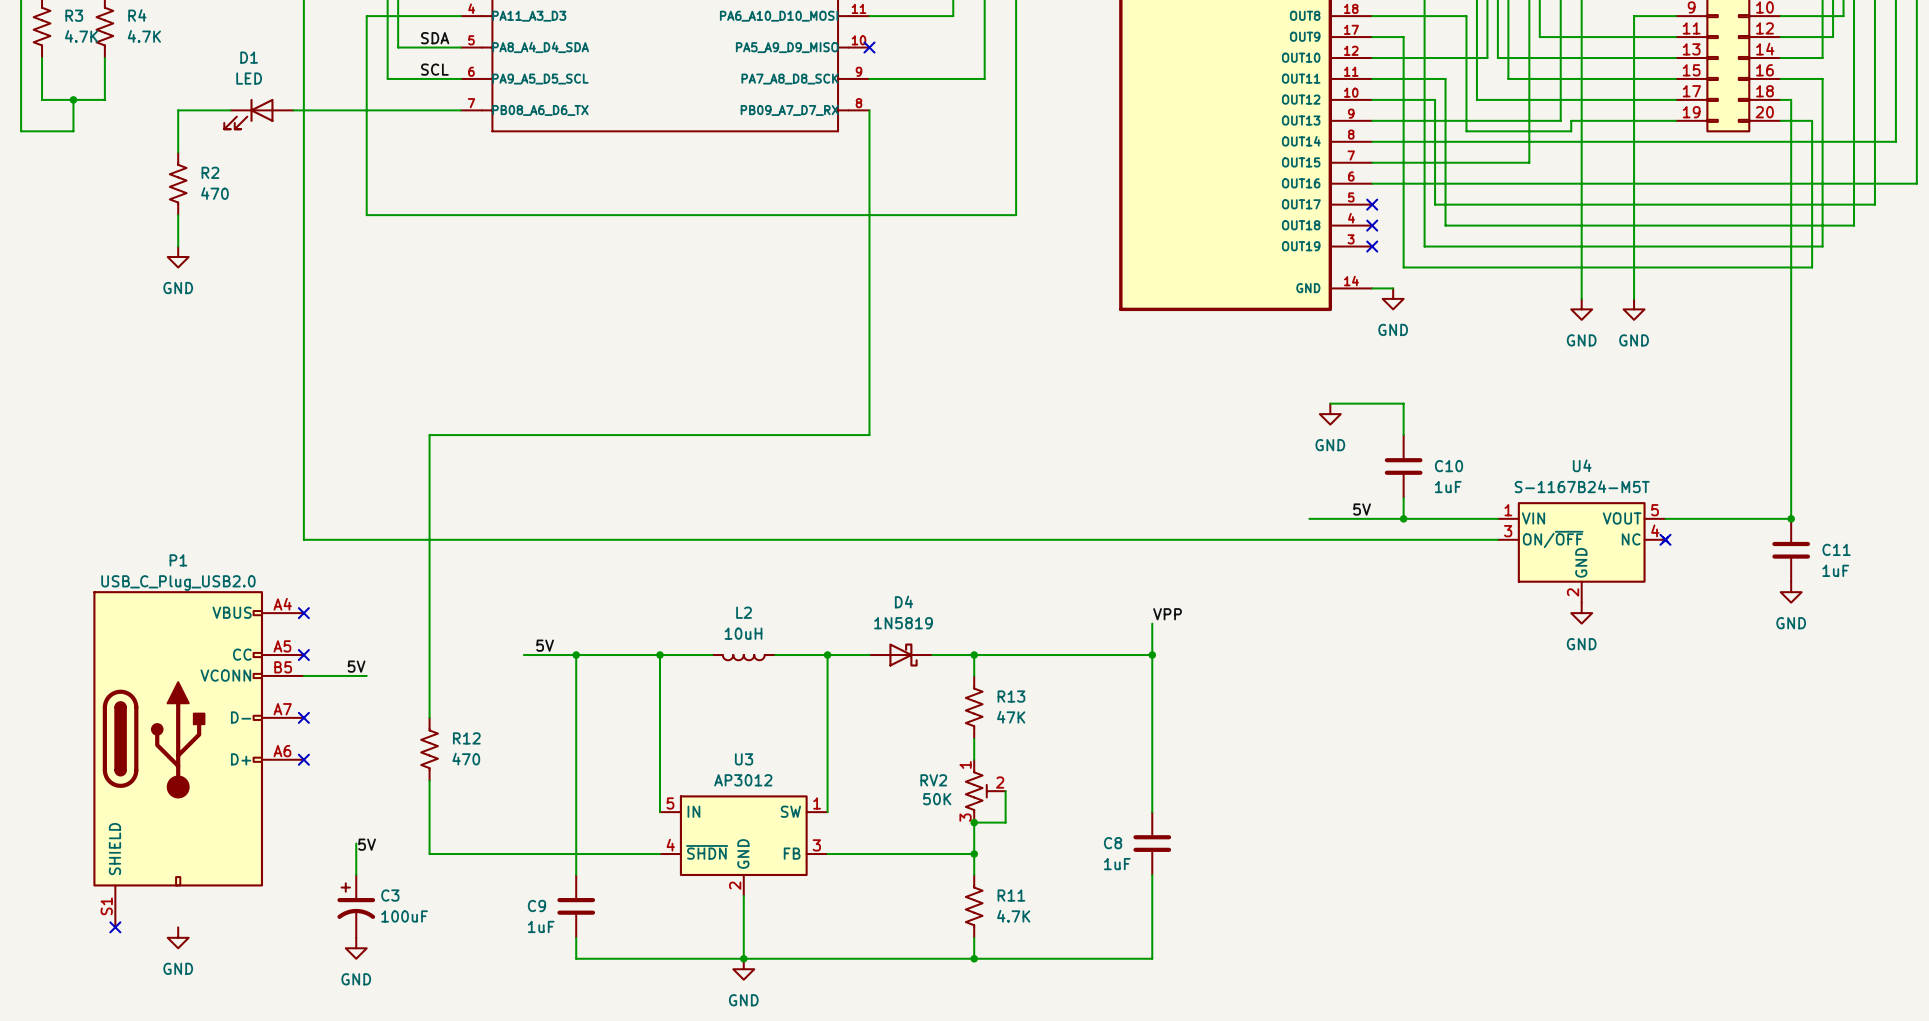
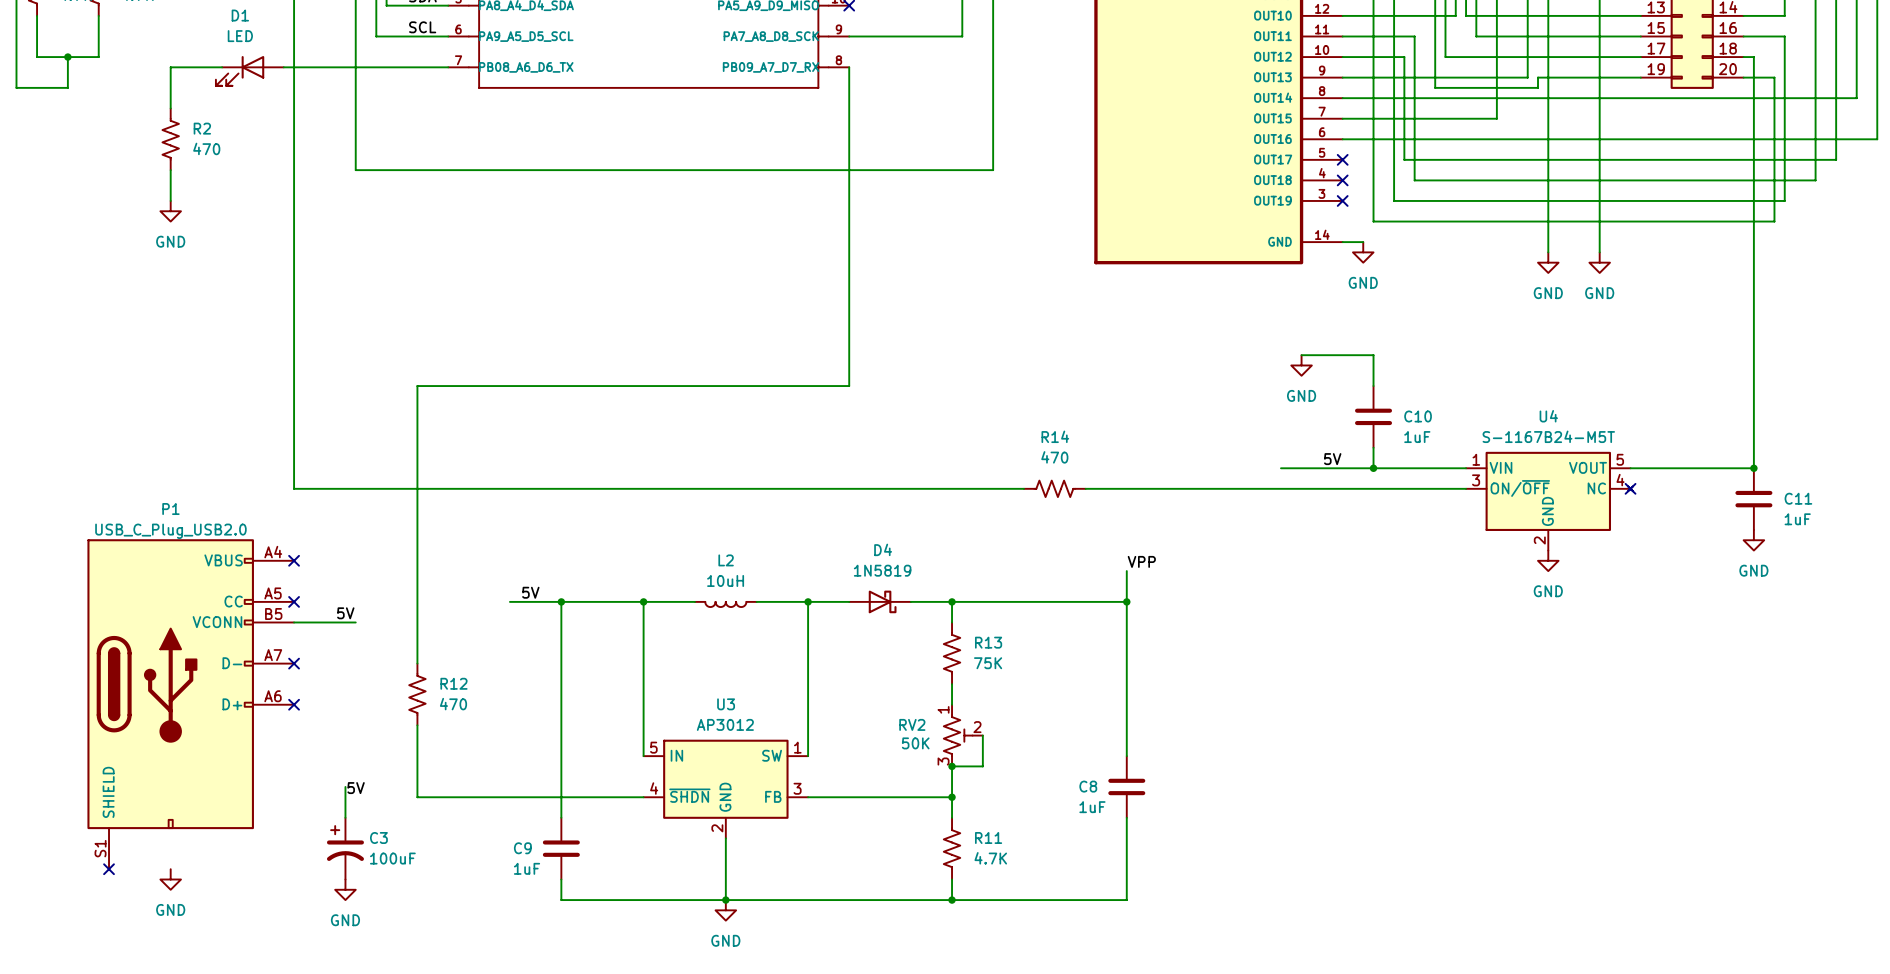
R14: none -> 470 (1054, 488)
R13 value: 47K (1011, 717) -> 75K (988, 663)

